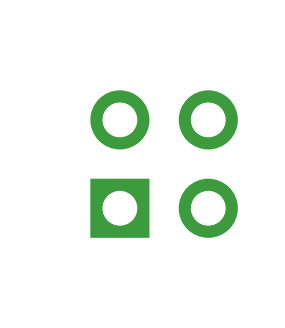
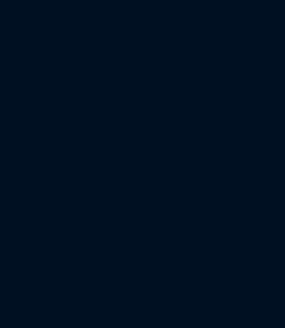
part: (164, 164) -> none

